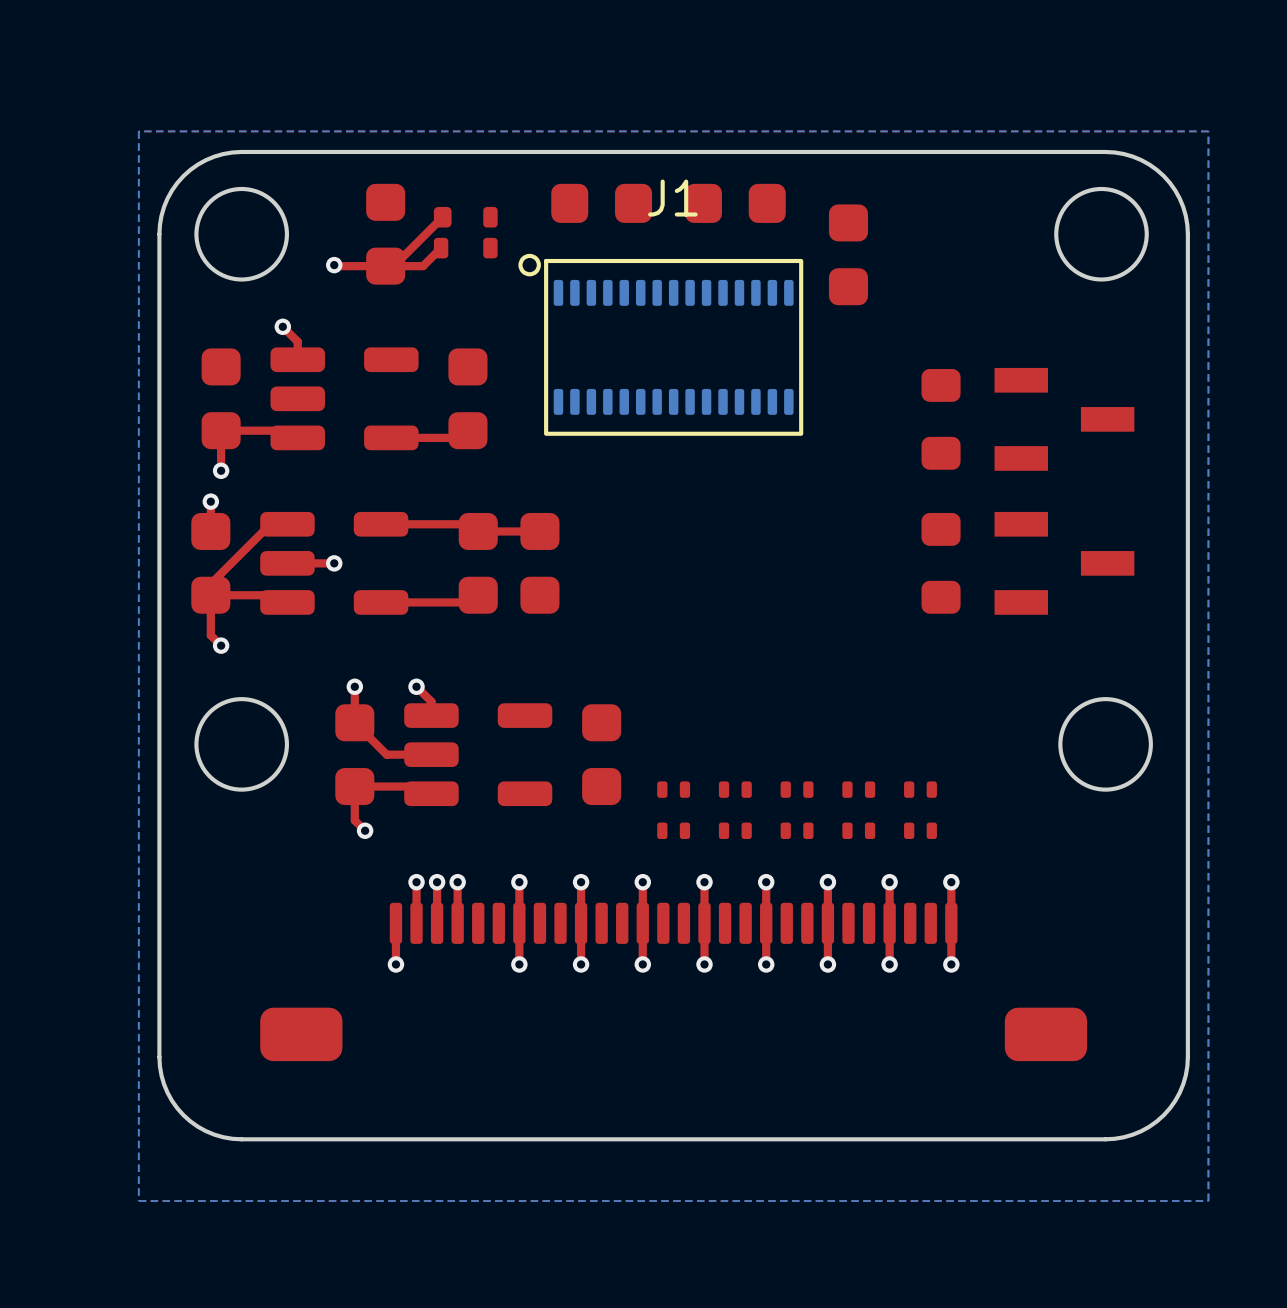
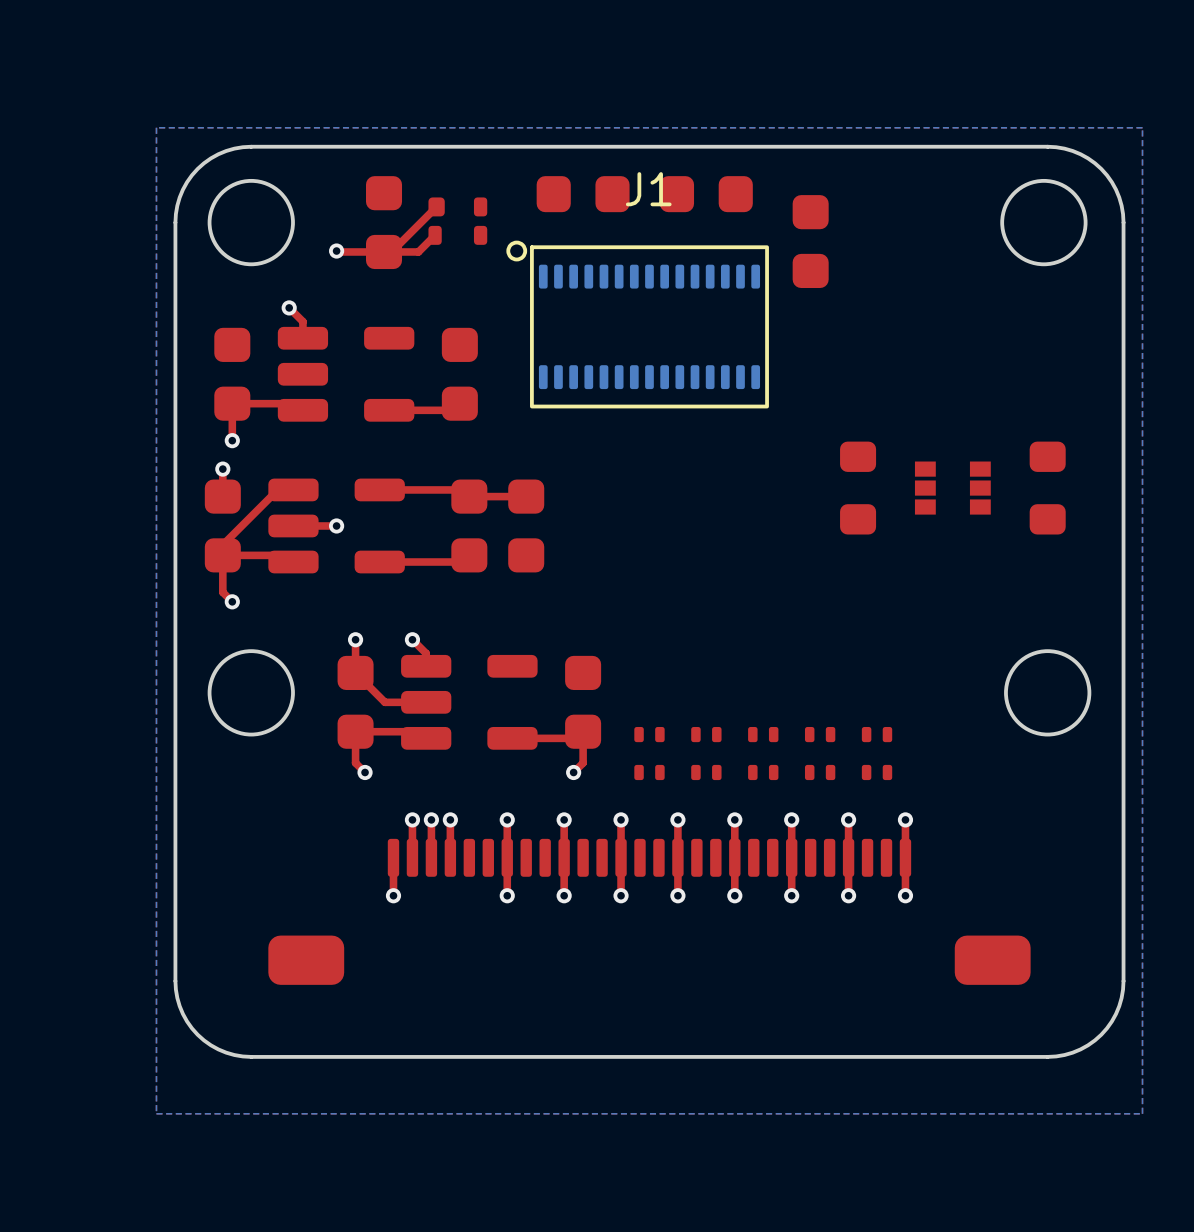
part: (941, 419) -> none
part: (1064, 419) -> none
part: none -> (858, 488)
part: none -> (952, 488)
part: none -> (1047, 488)
part: (941, 563) -> none
part: (1064, 563) -> none
top track: none -> (512, 738) (576, 738) (583, 731) (583, 763) (573, 772)
via: none -> (573, 772)

